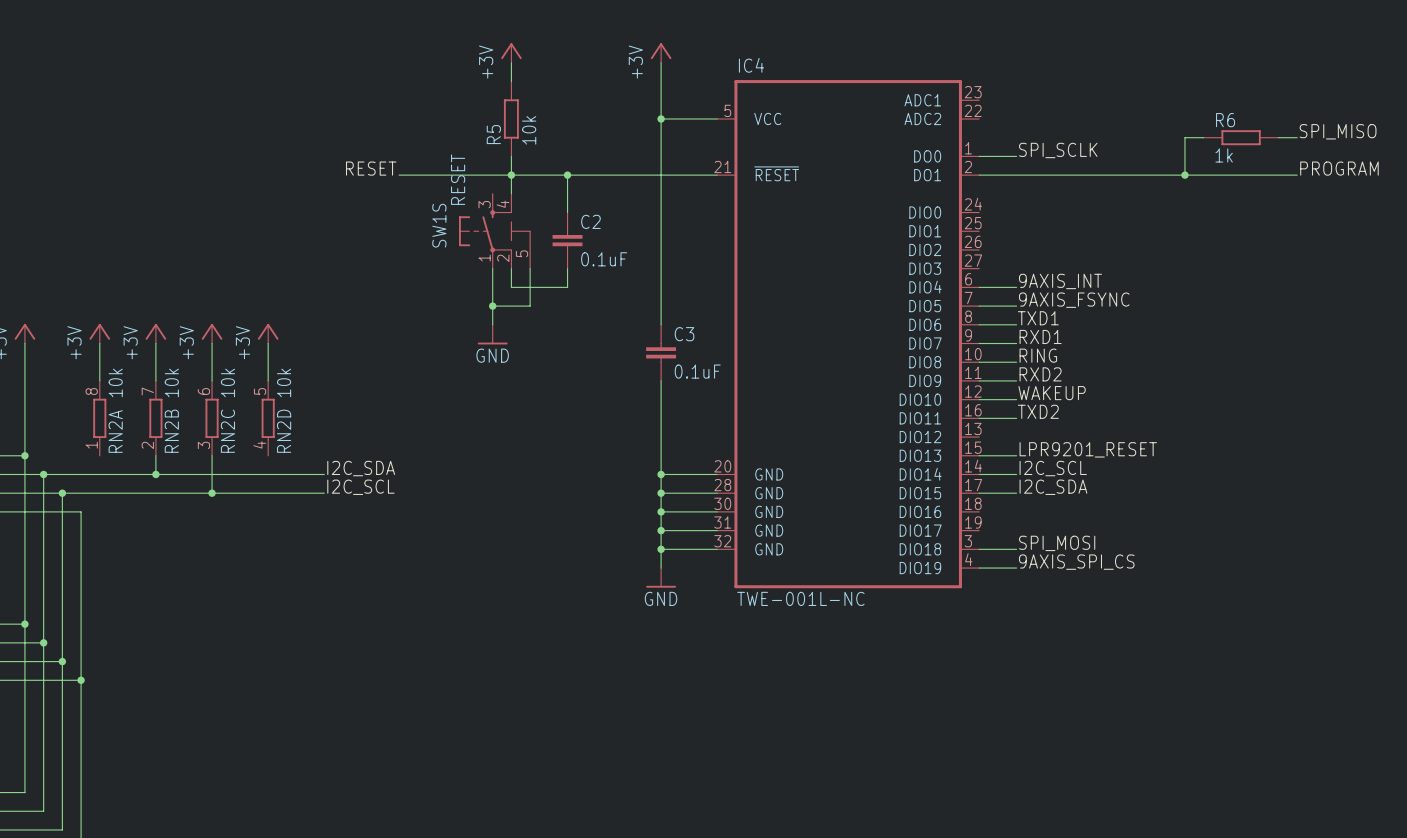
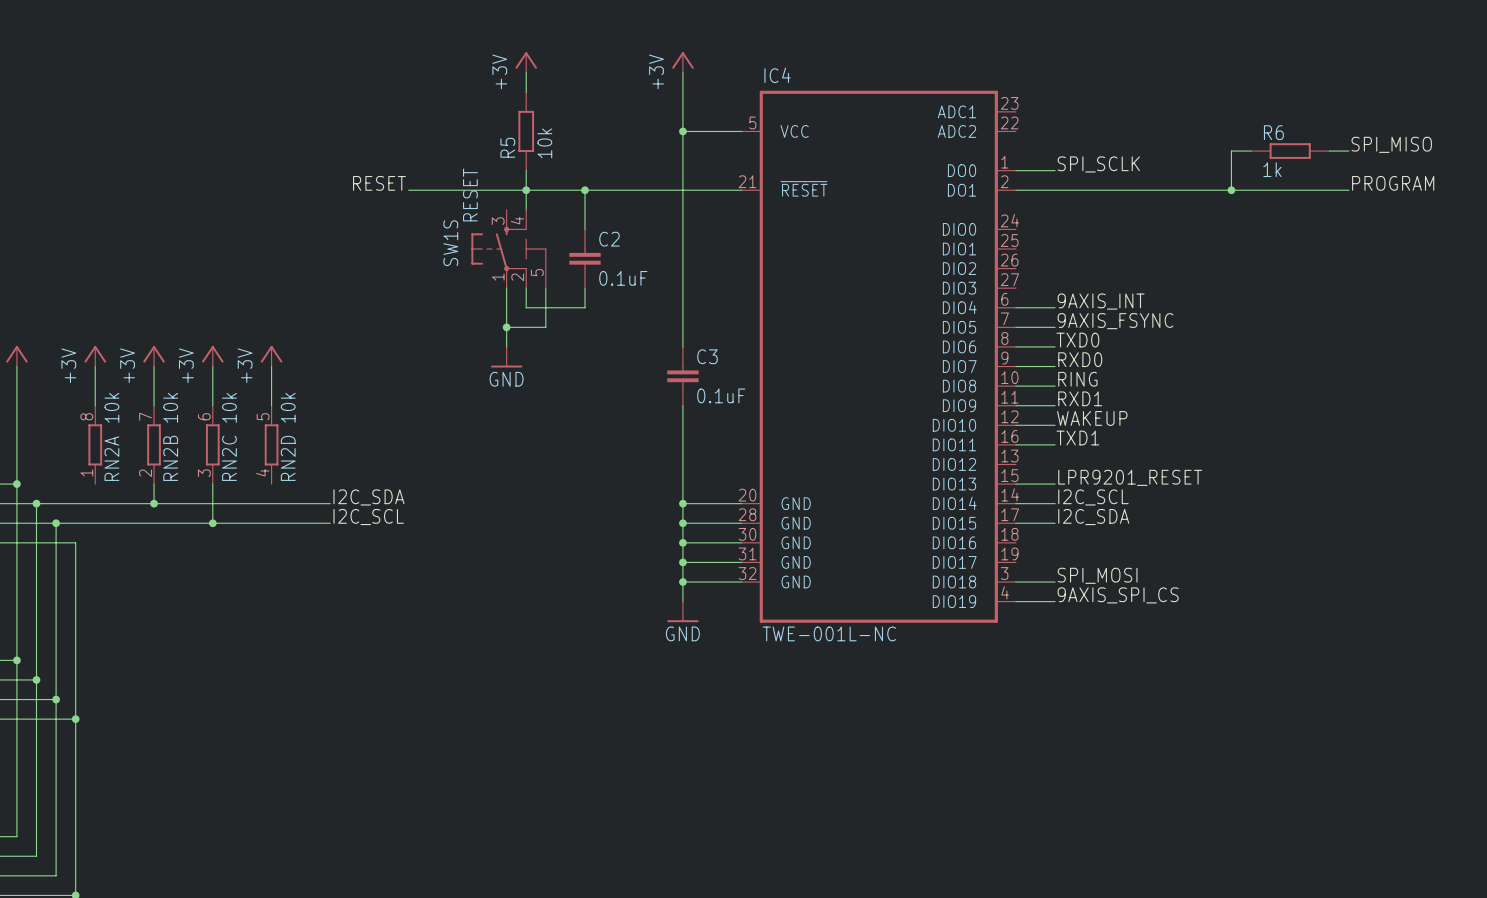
label: TXD1 (1038, 318) -> TXD0 (1077, 340)
label: RXD1 (1040, 336) -> RXD0 (1080, 359)
label: RXD2 (1040, 374) -> RXD1 (1080, 398)
label: TXD2 (1038, 411) -> TXD1 (1077, 438)

